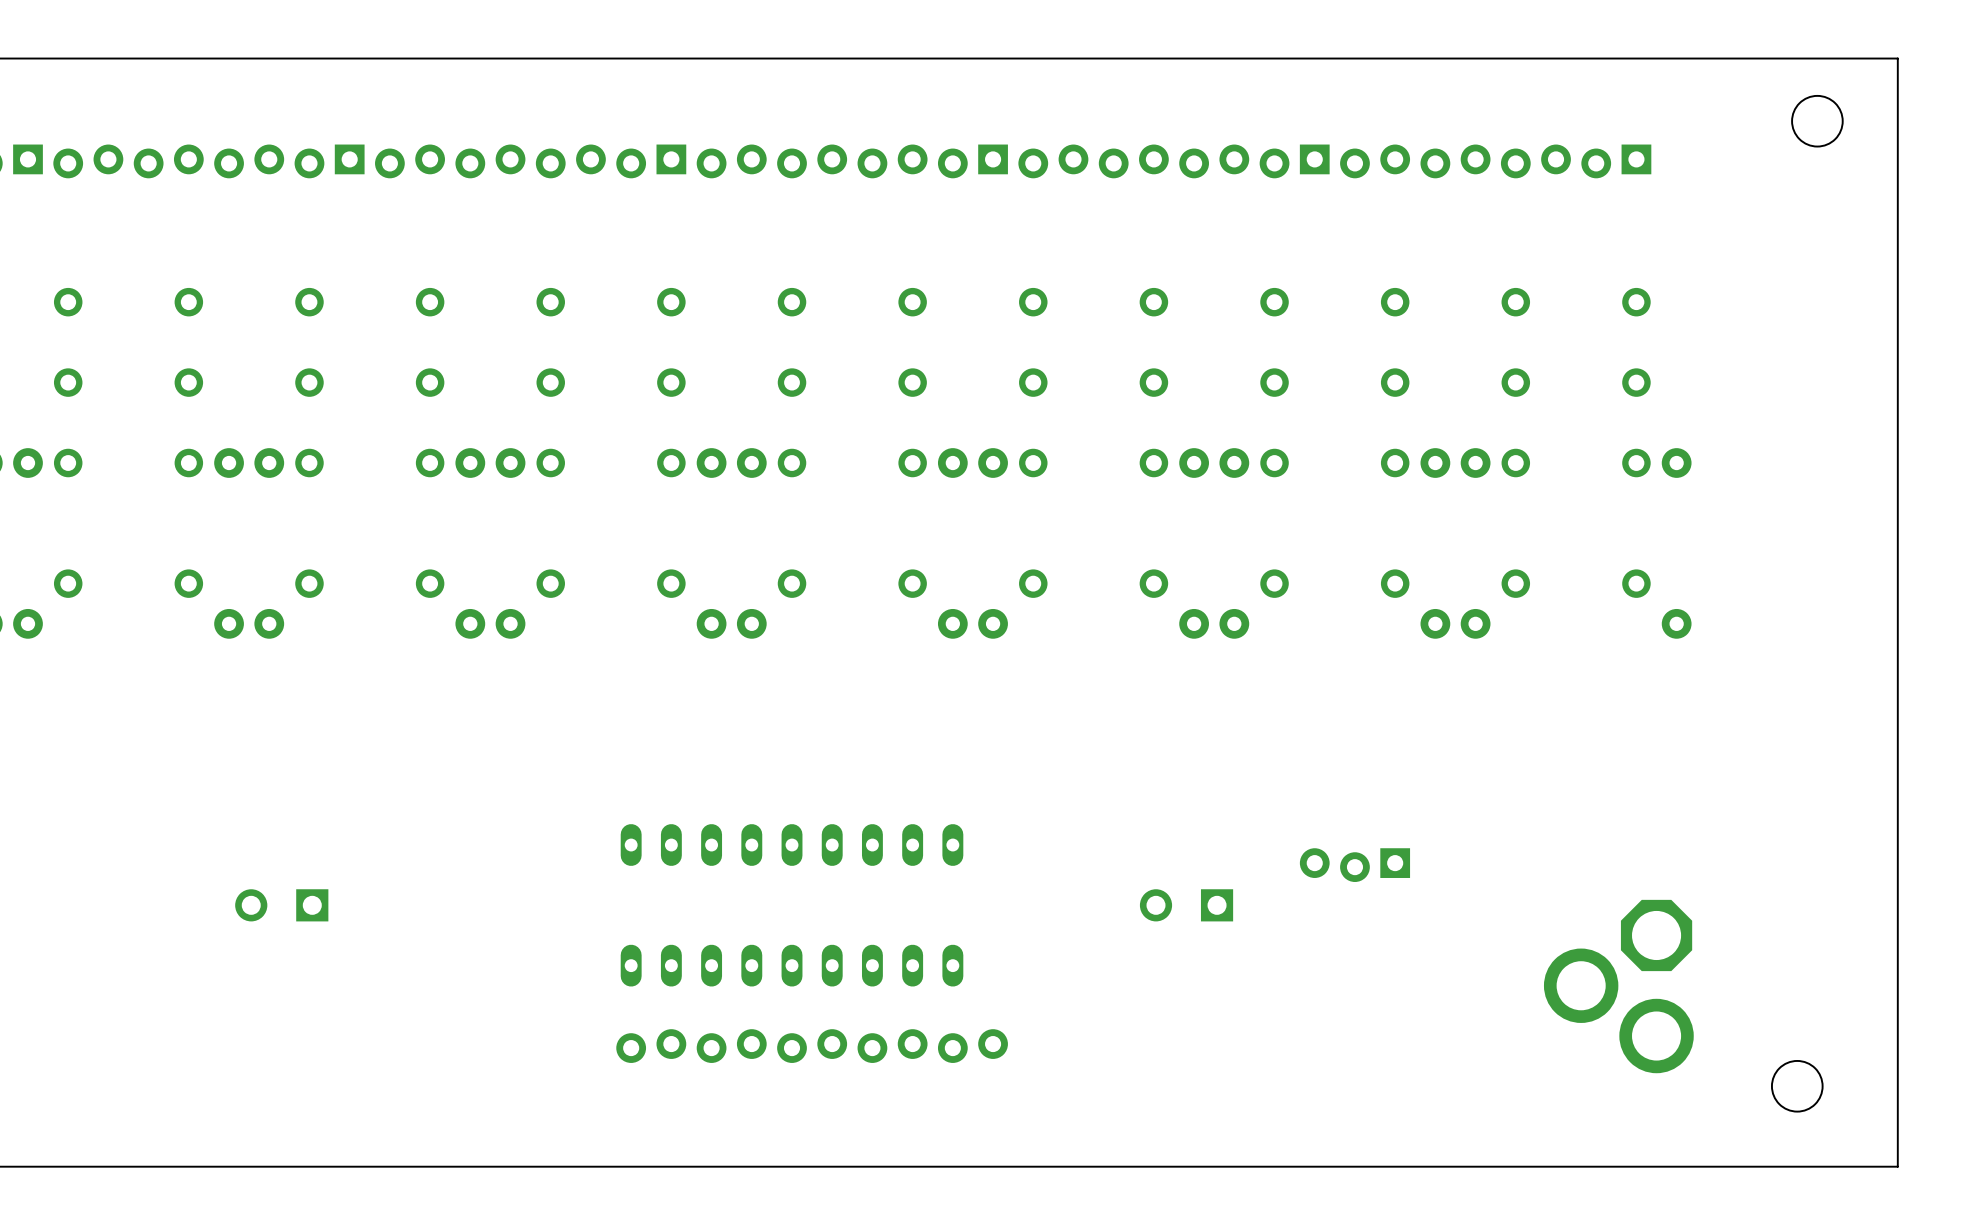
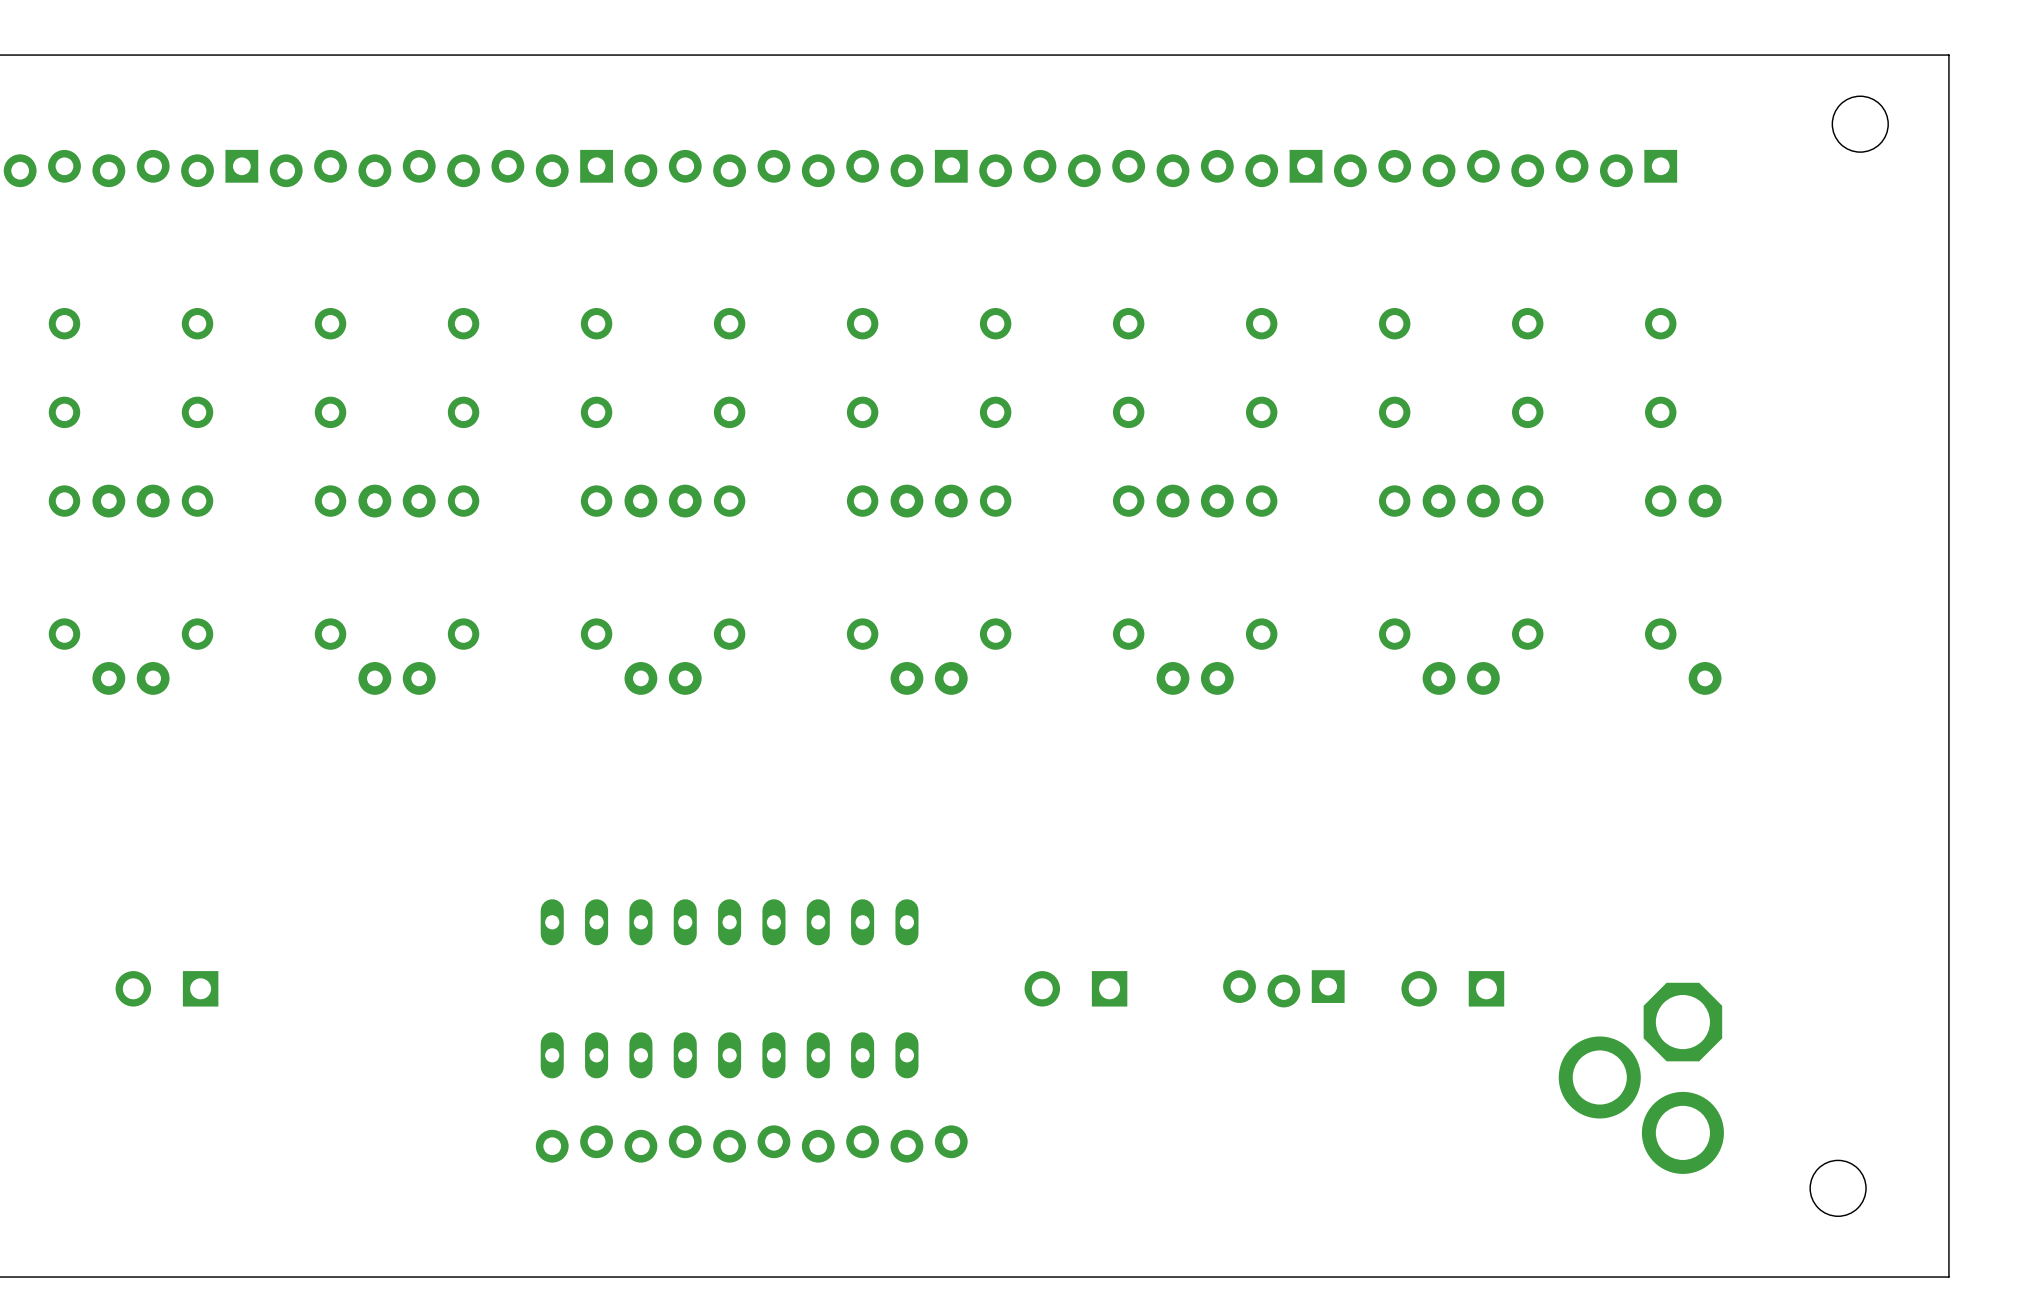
part position: (1354, 865) -> (1283, 988)
part position: (1186, 905) -> (1075, 988)
part: none -> (1452, 988)

